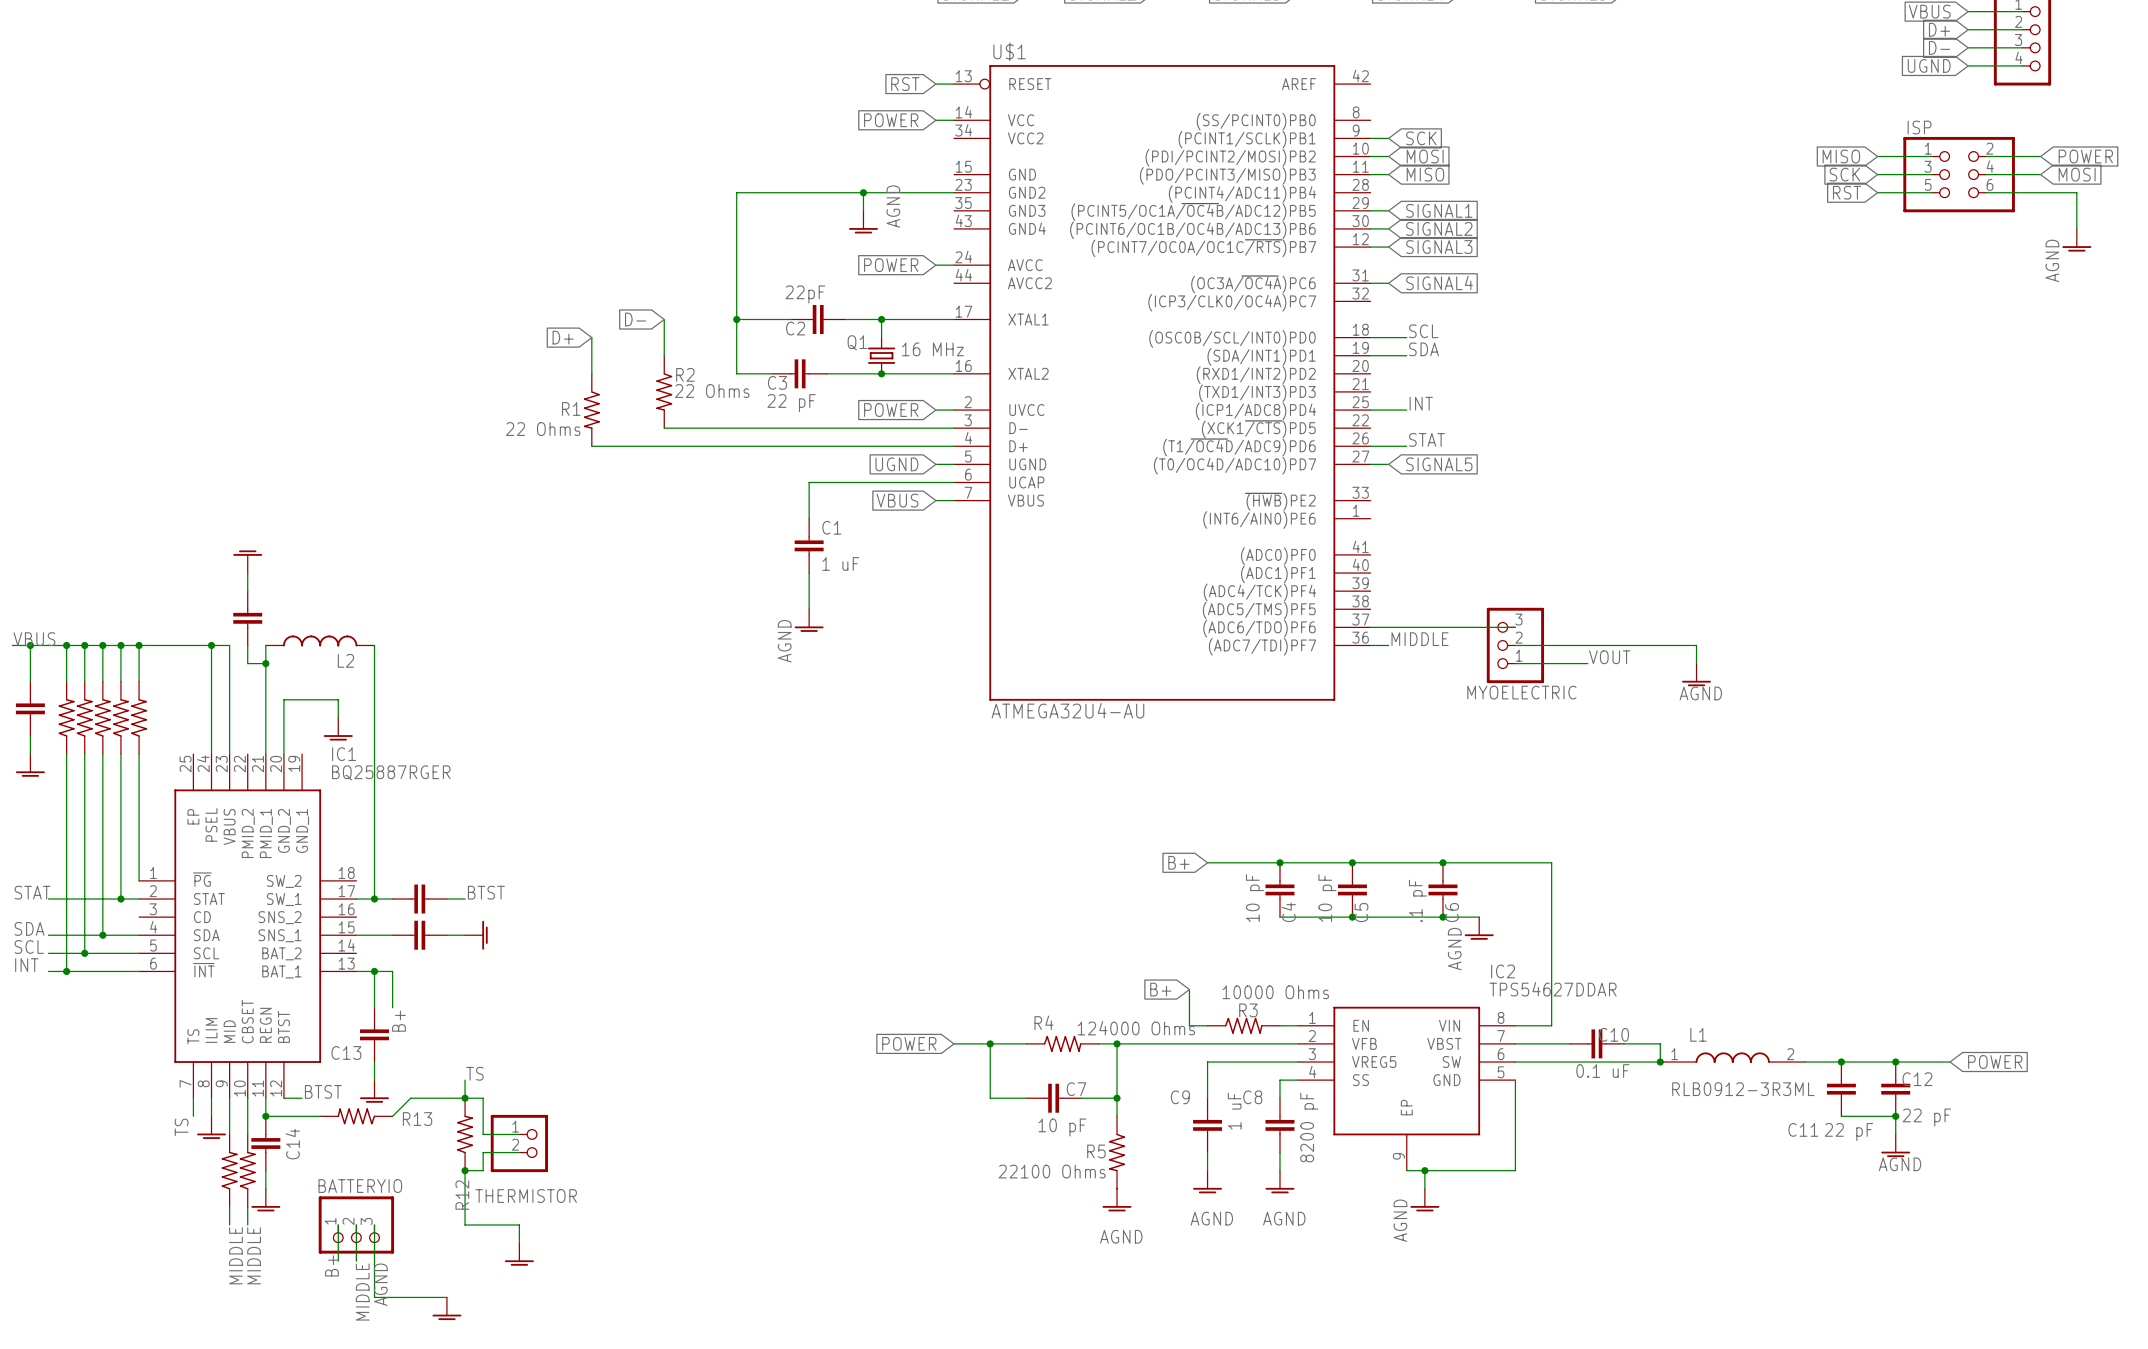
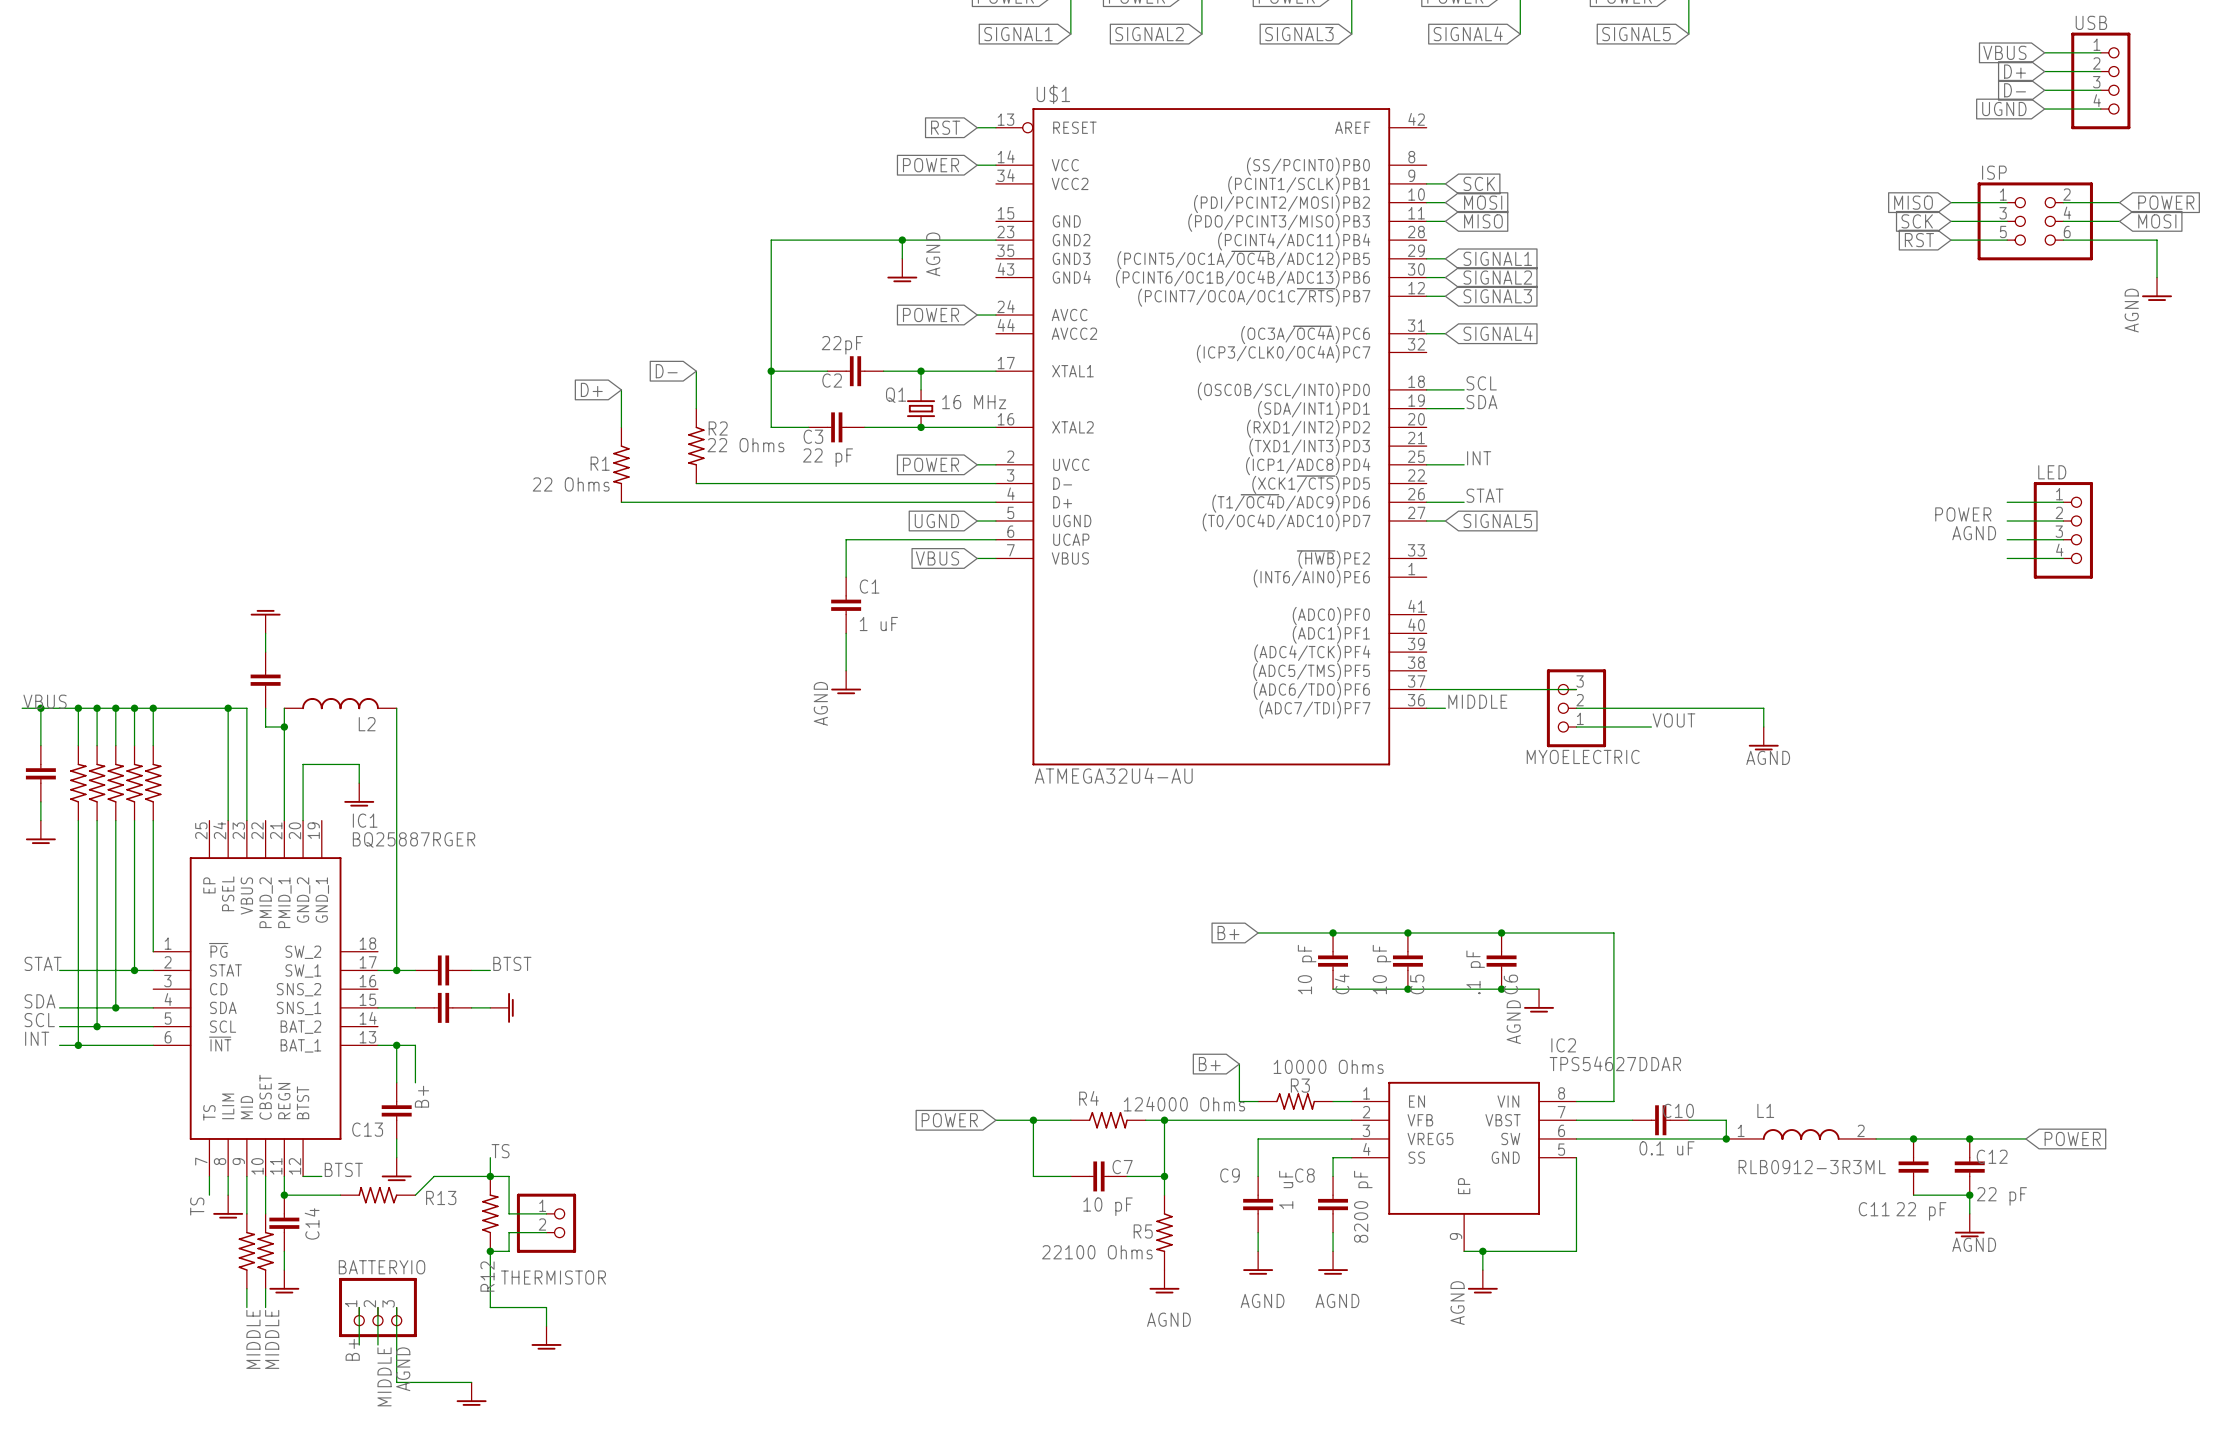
wire: none -> (2007, 502) (2063, 502)
label: none -> POWER (1963, 514)
wire: none -> (2007, 521) (2063, 521)
LED: none -> (2063, 530)
label: none -> AGND (1974, 533)
wire: none -> (2007, 539) (2063, 539)
wire: none -> (2007, 558) (2063, 558)

